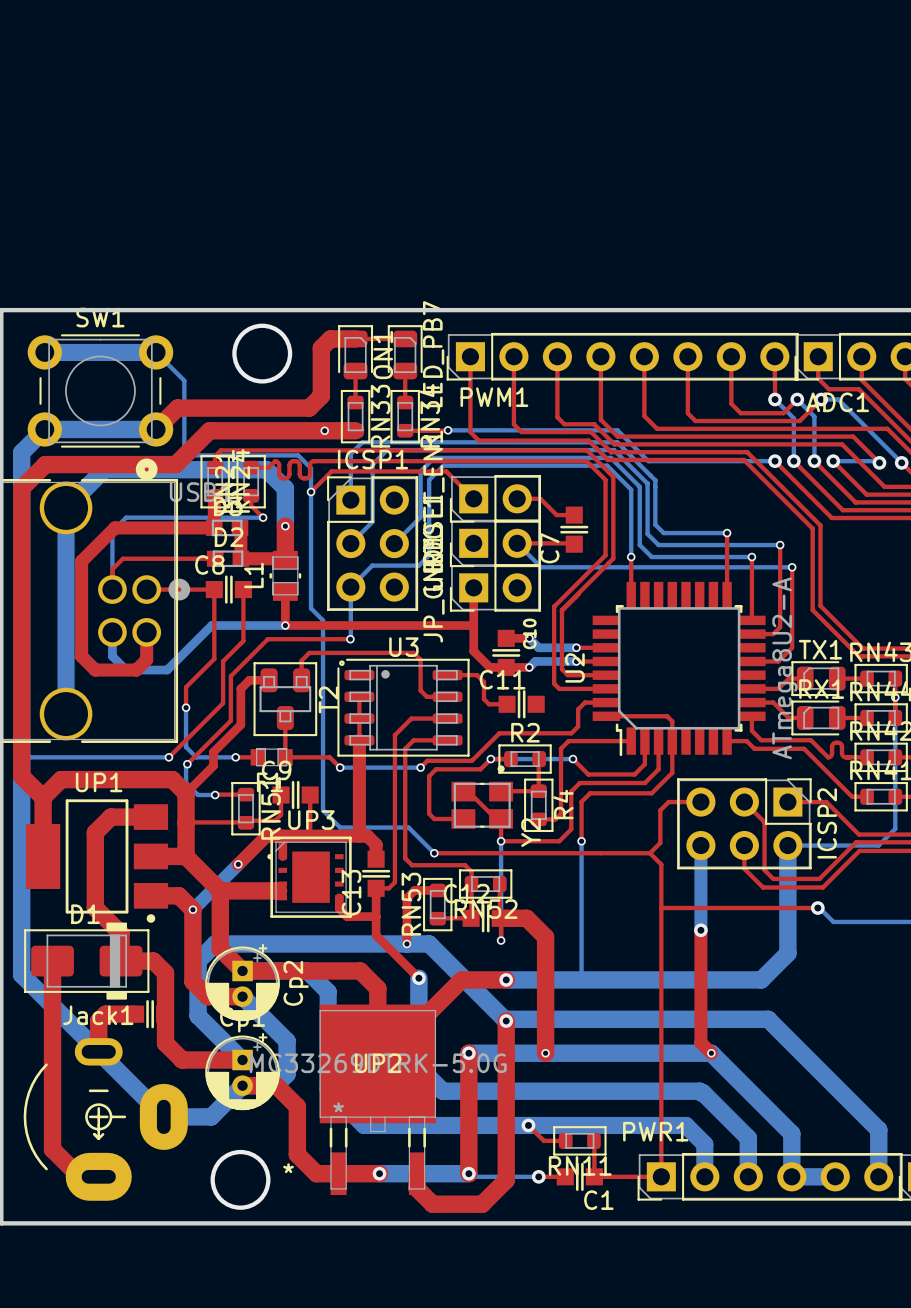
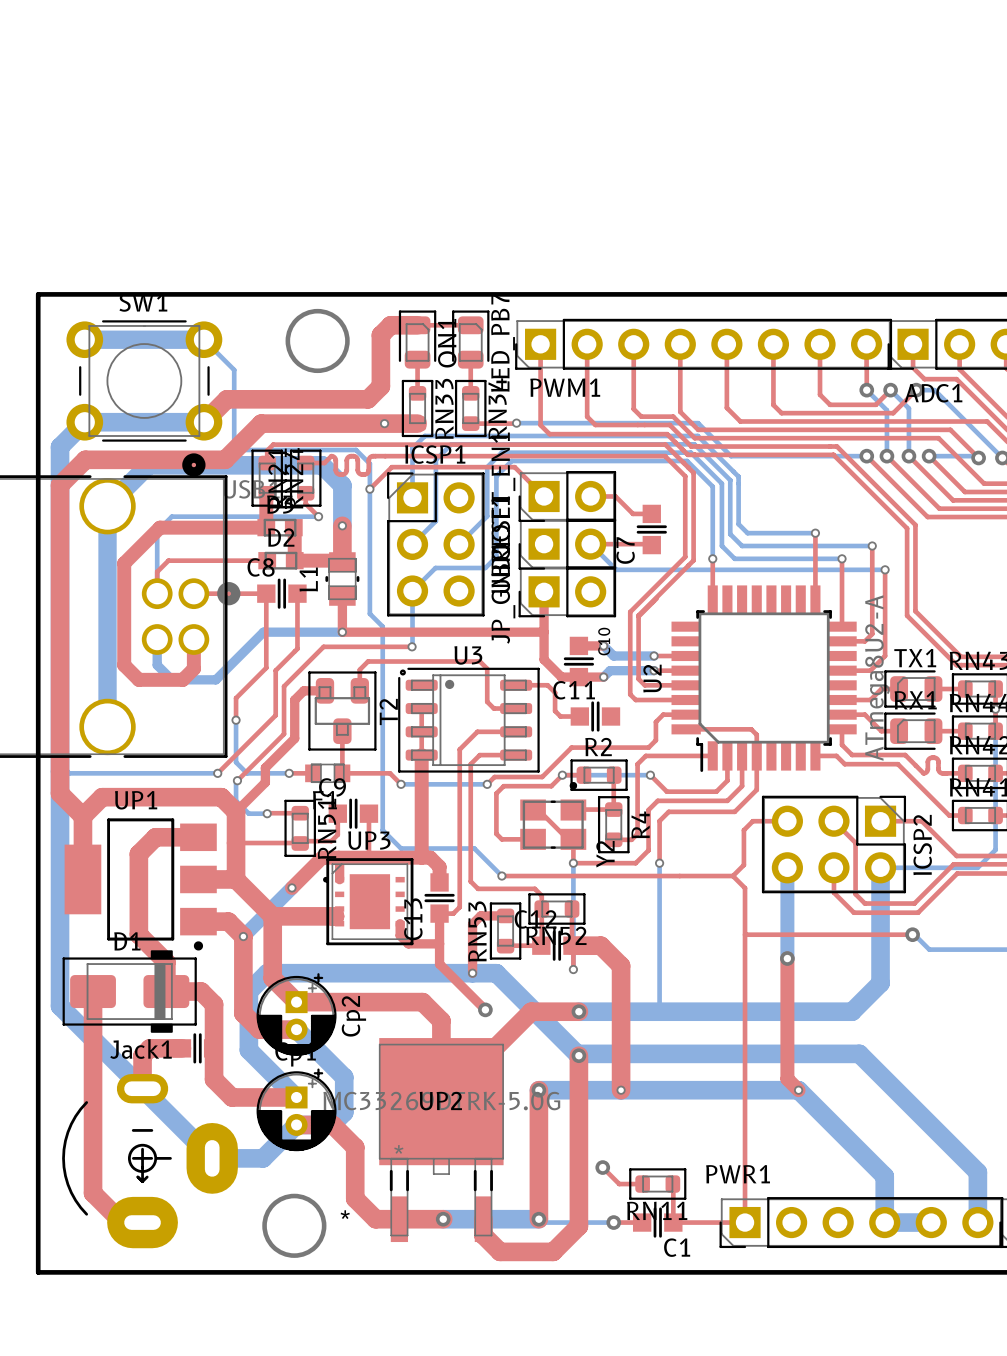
bottom track: (242, 970) (307, 970) (328, 991) (328, 1089) (364, 1125) (686, 1125) (704, 1144) (704, 1176) -> none
bottom track: (418, 978) (418, 1067) (442, 1091) (699, 1091) (748, 1138) (748, 1176) -> none

